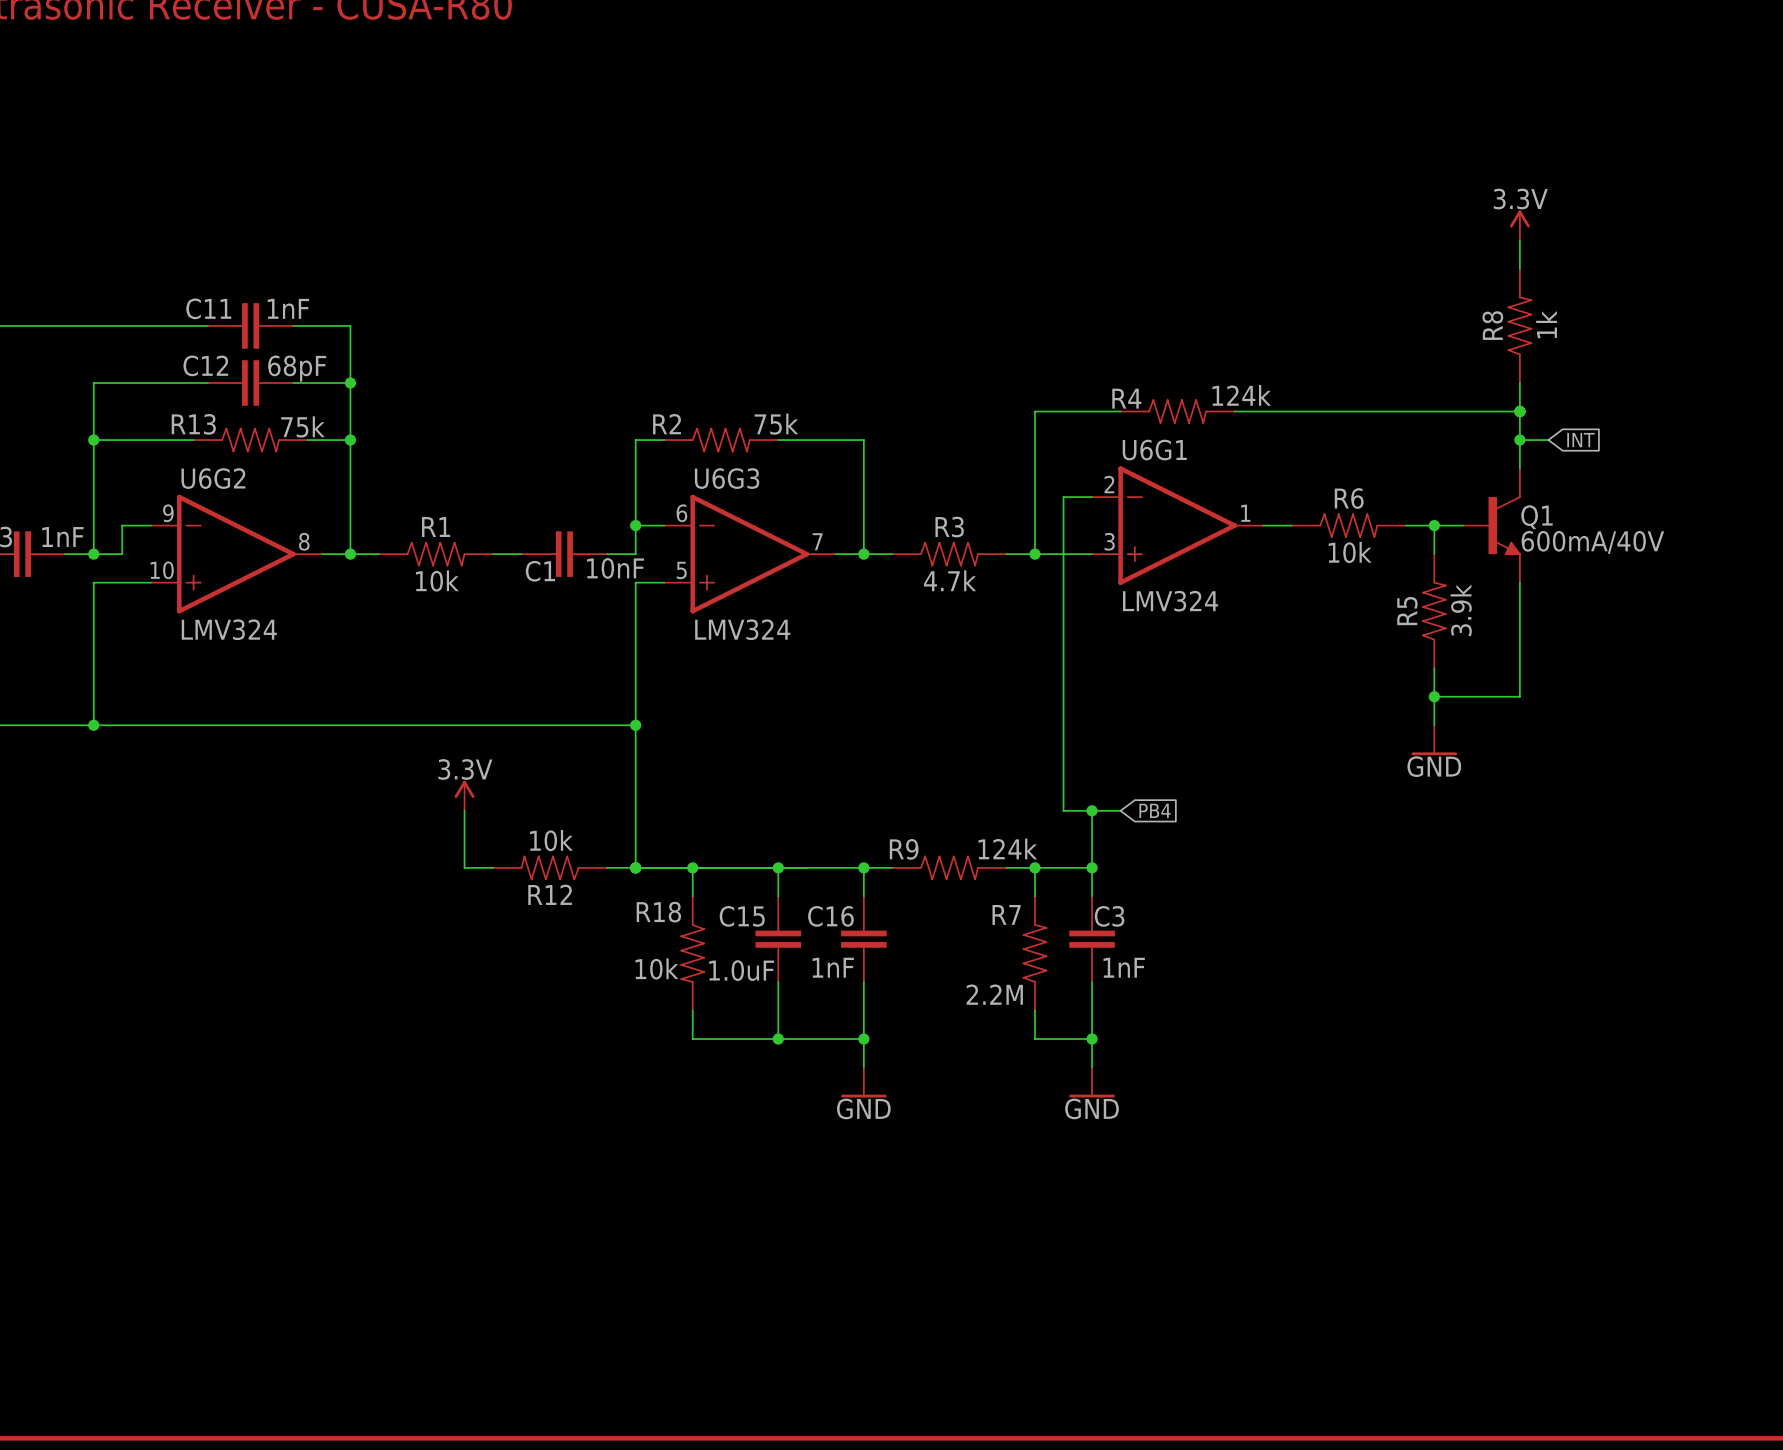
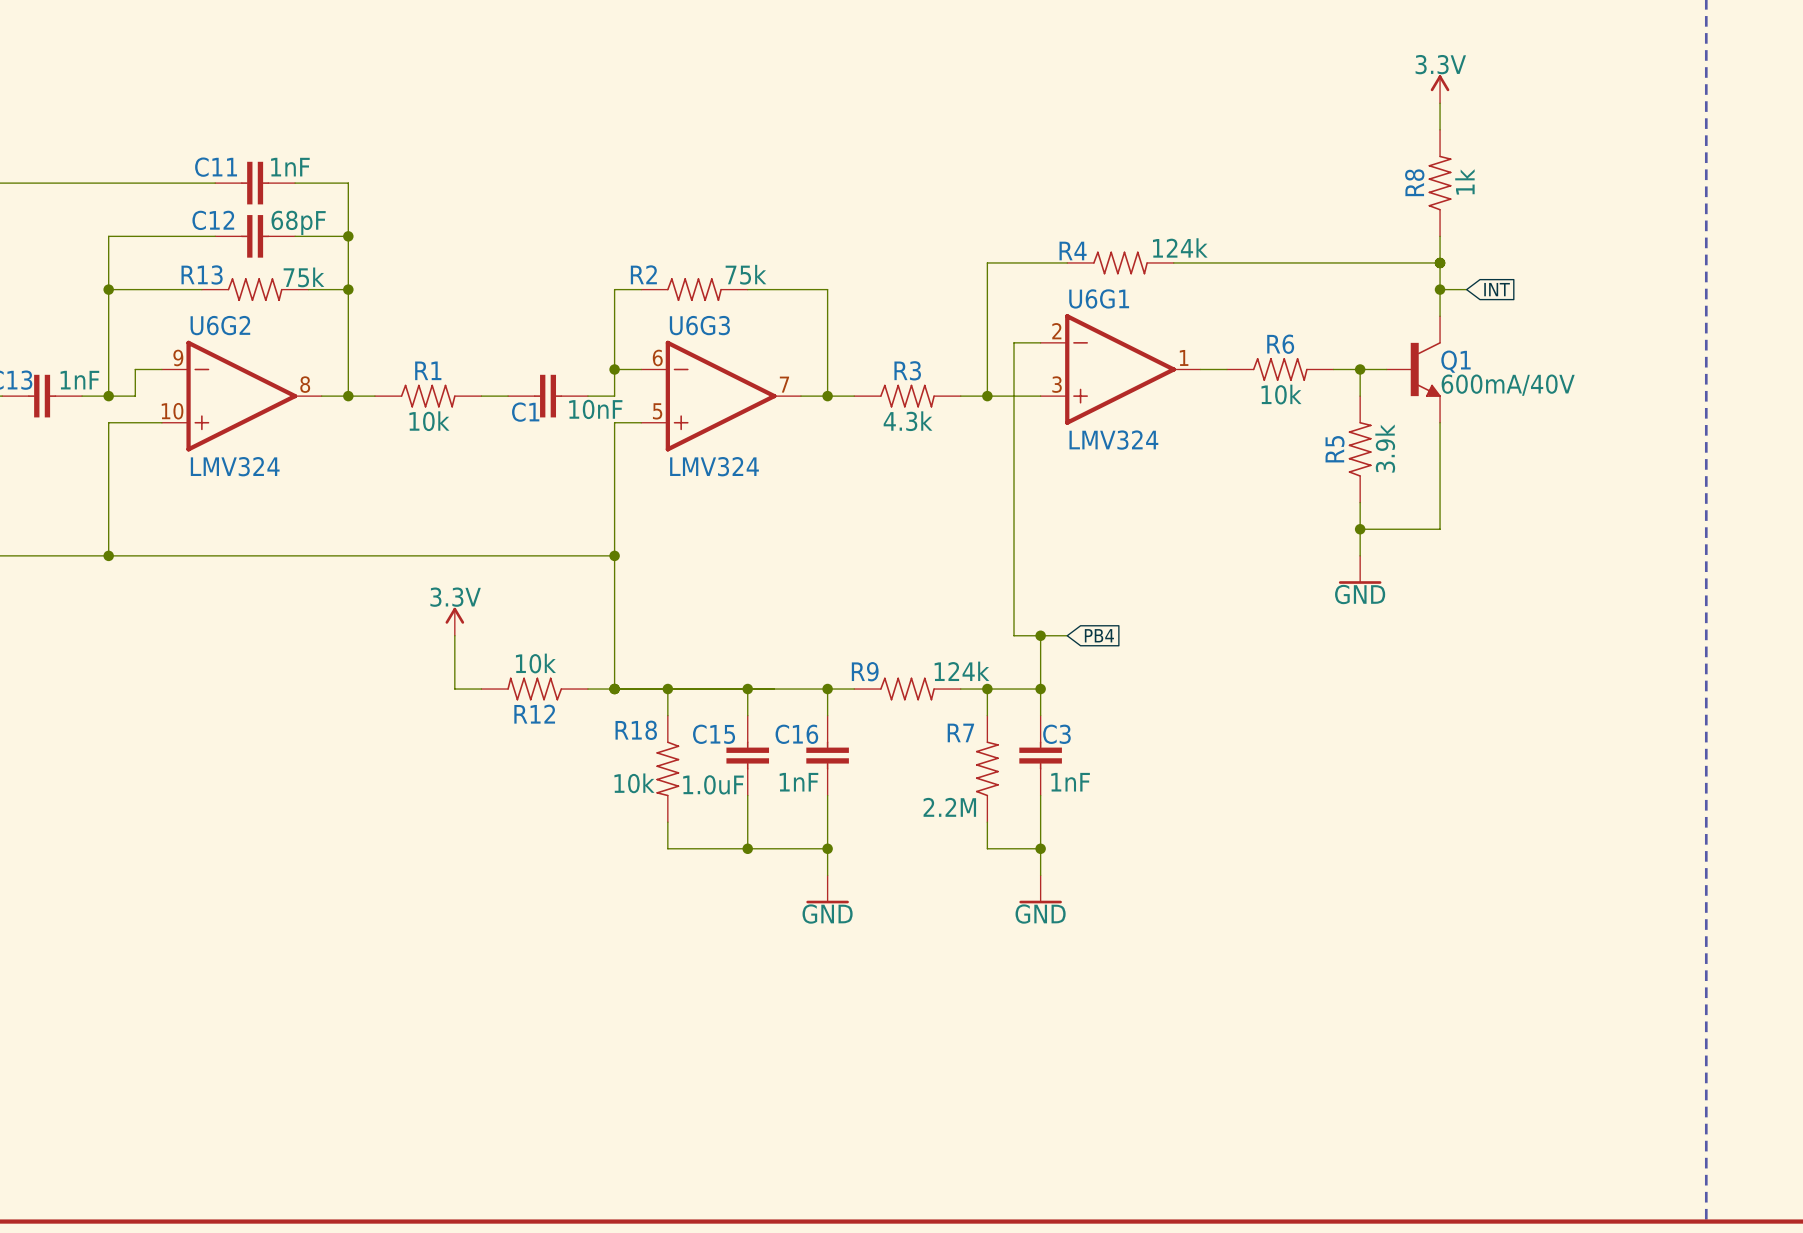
R3 value: 4.7k (950, 580) -> 4.3k (908, 421)

